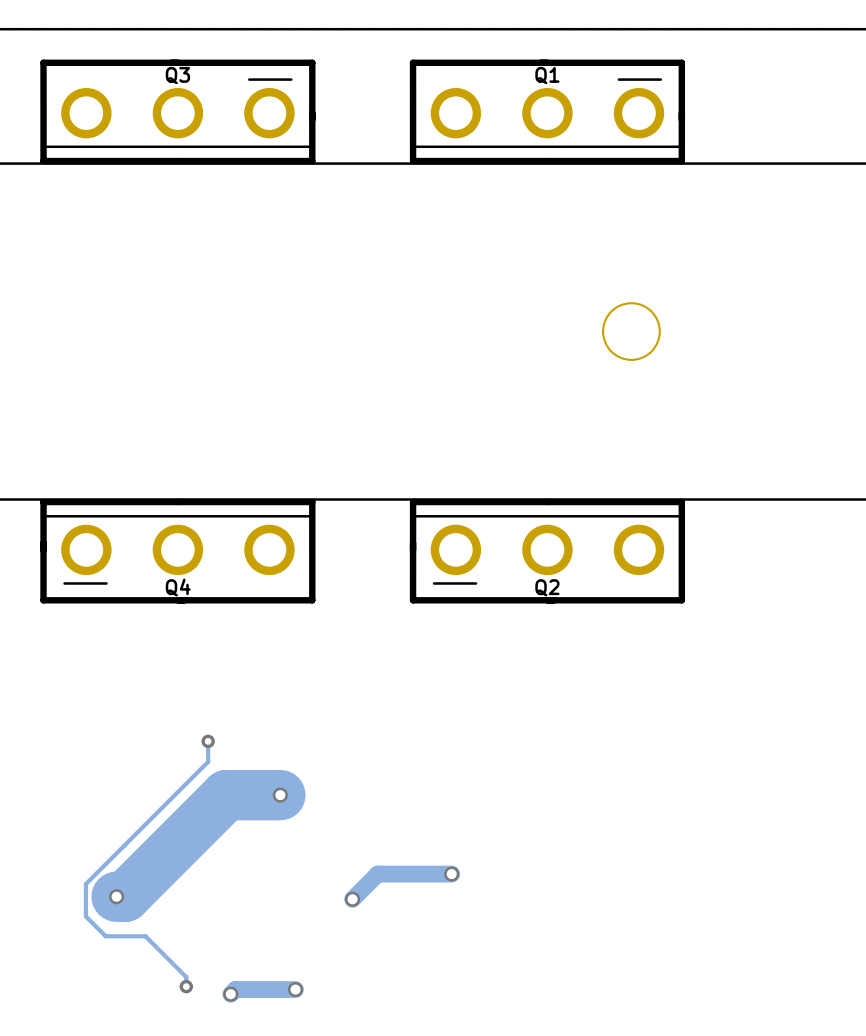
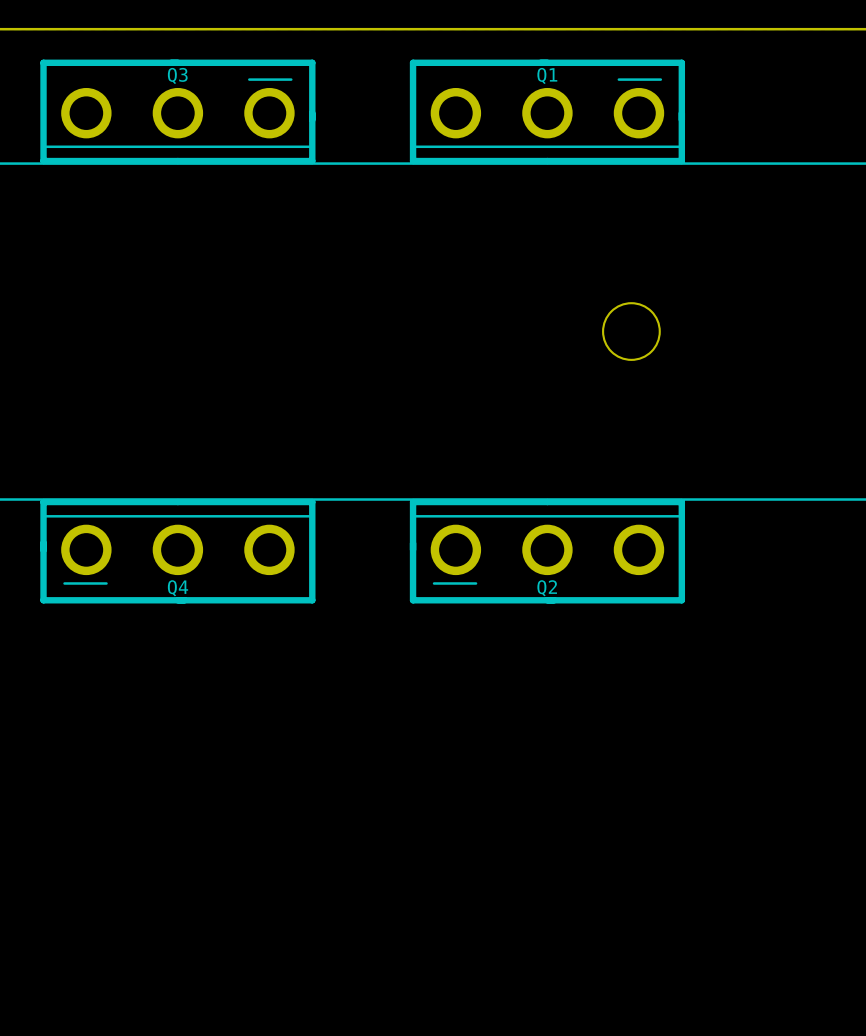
track: (208, 741) (208, 761) (85, 884) (85, 916) (105, 936) (145, 936) (186, 977) (186, 986) -> none
via: (208, 741) -> none
track: (280, 795) (226, 795) (124, 896) (116, 896) -> none
via: (280, 795) -> none
track: (451, 874) (377, 874) (352, 899) -> none
via: (451, 874) -> none
via: (116, 896) -> none
via: (352, 899) -> none
via: (186, 986) -> none
track: (295, 989) (235, 989) (230, 994) -> none
via: (295, 989) -> none
via: (230, 994) -> none

